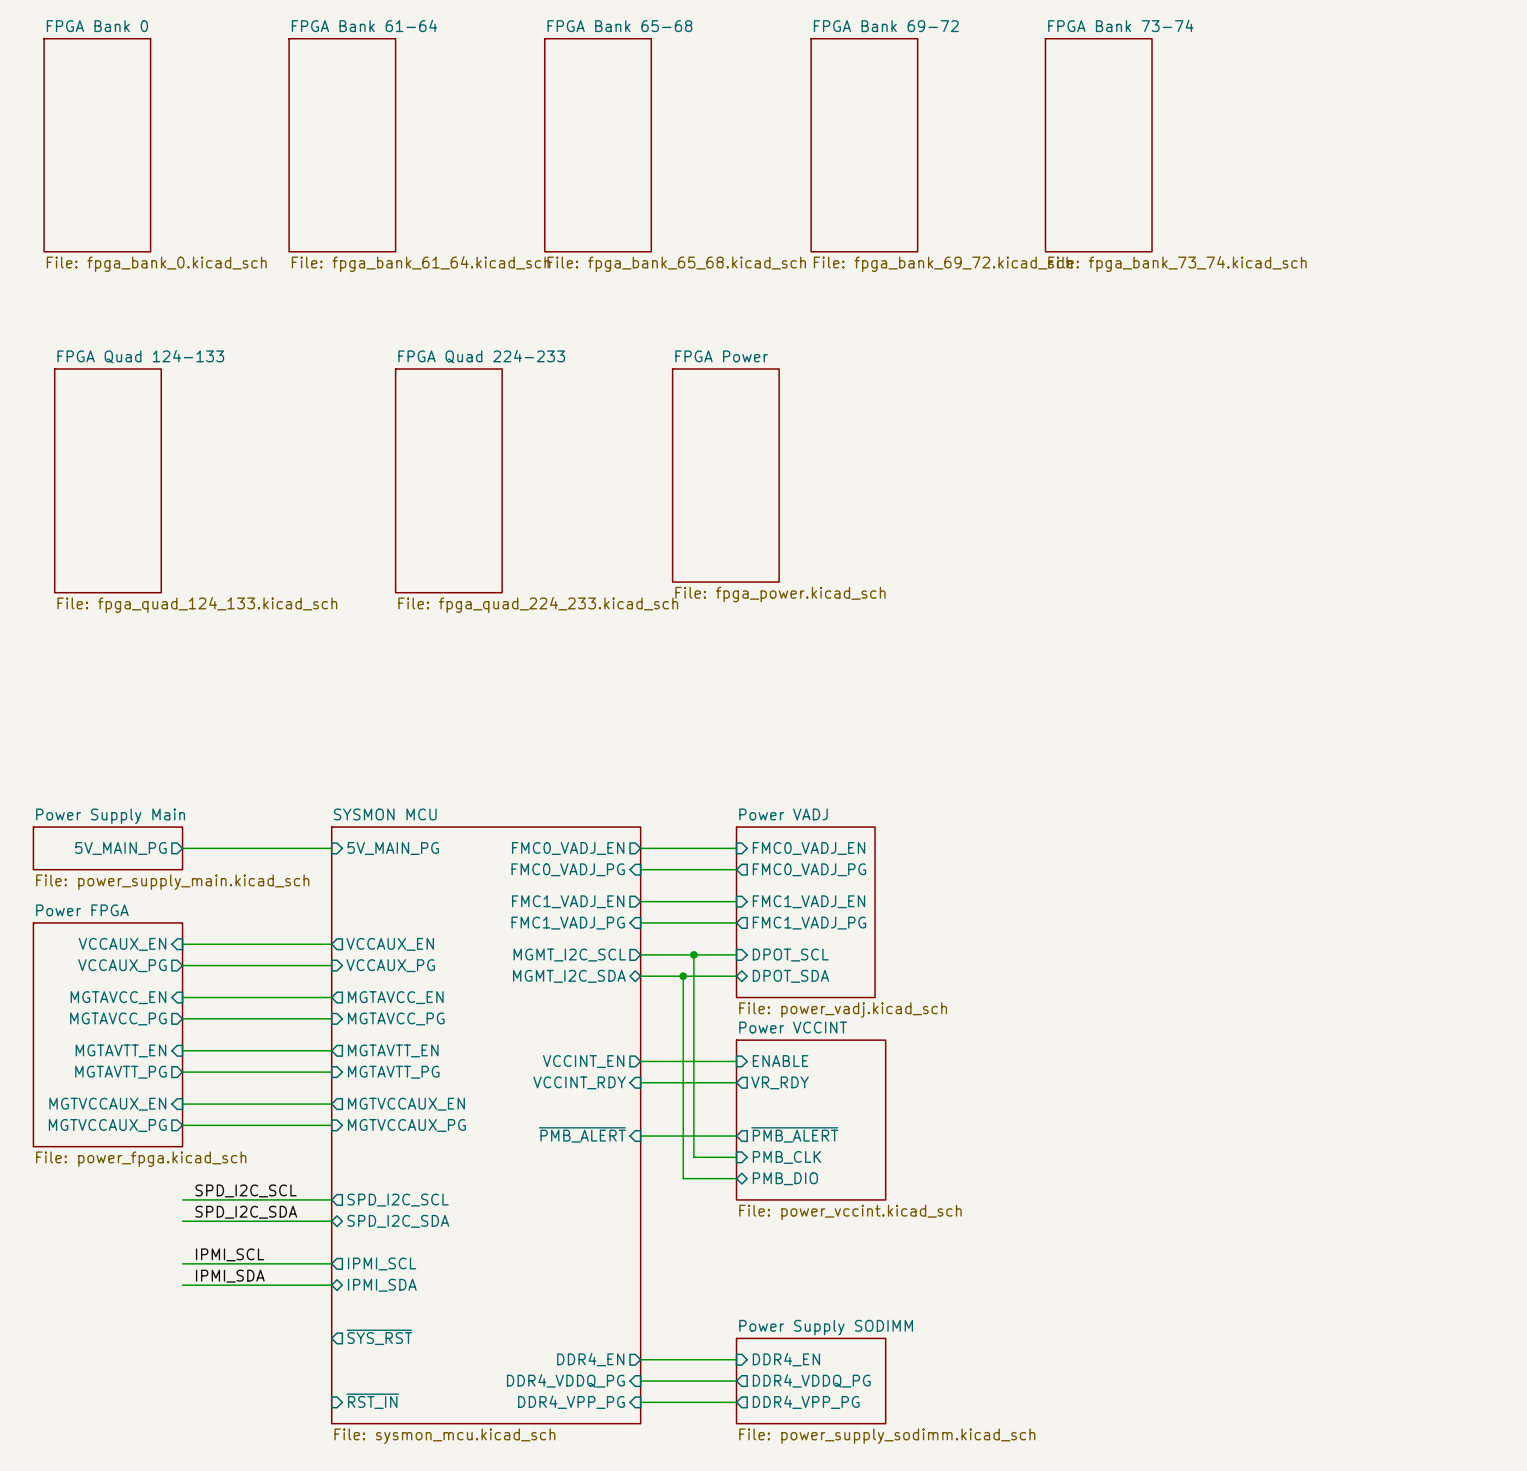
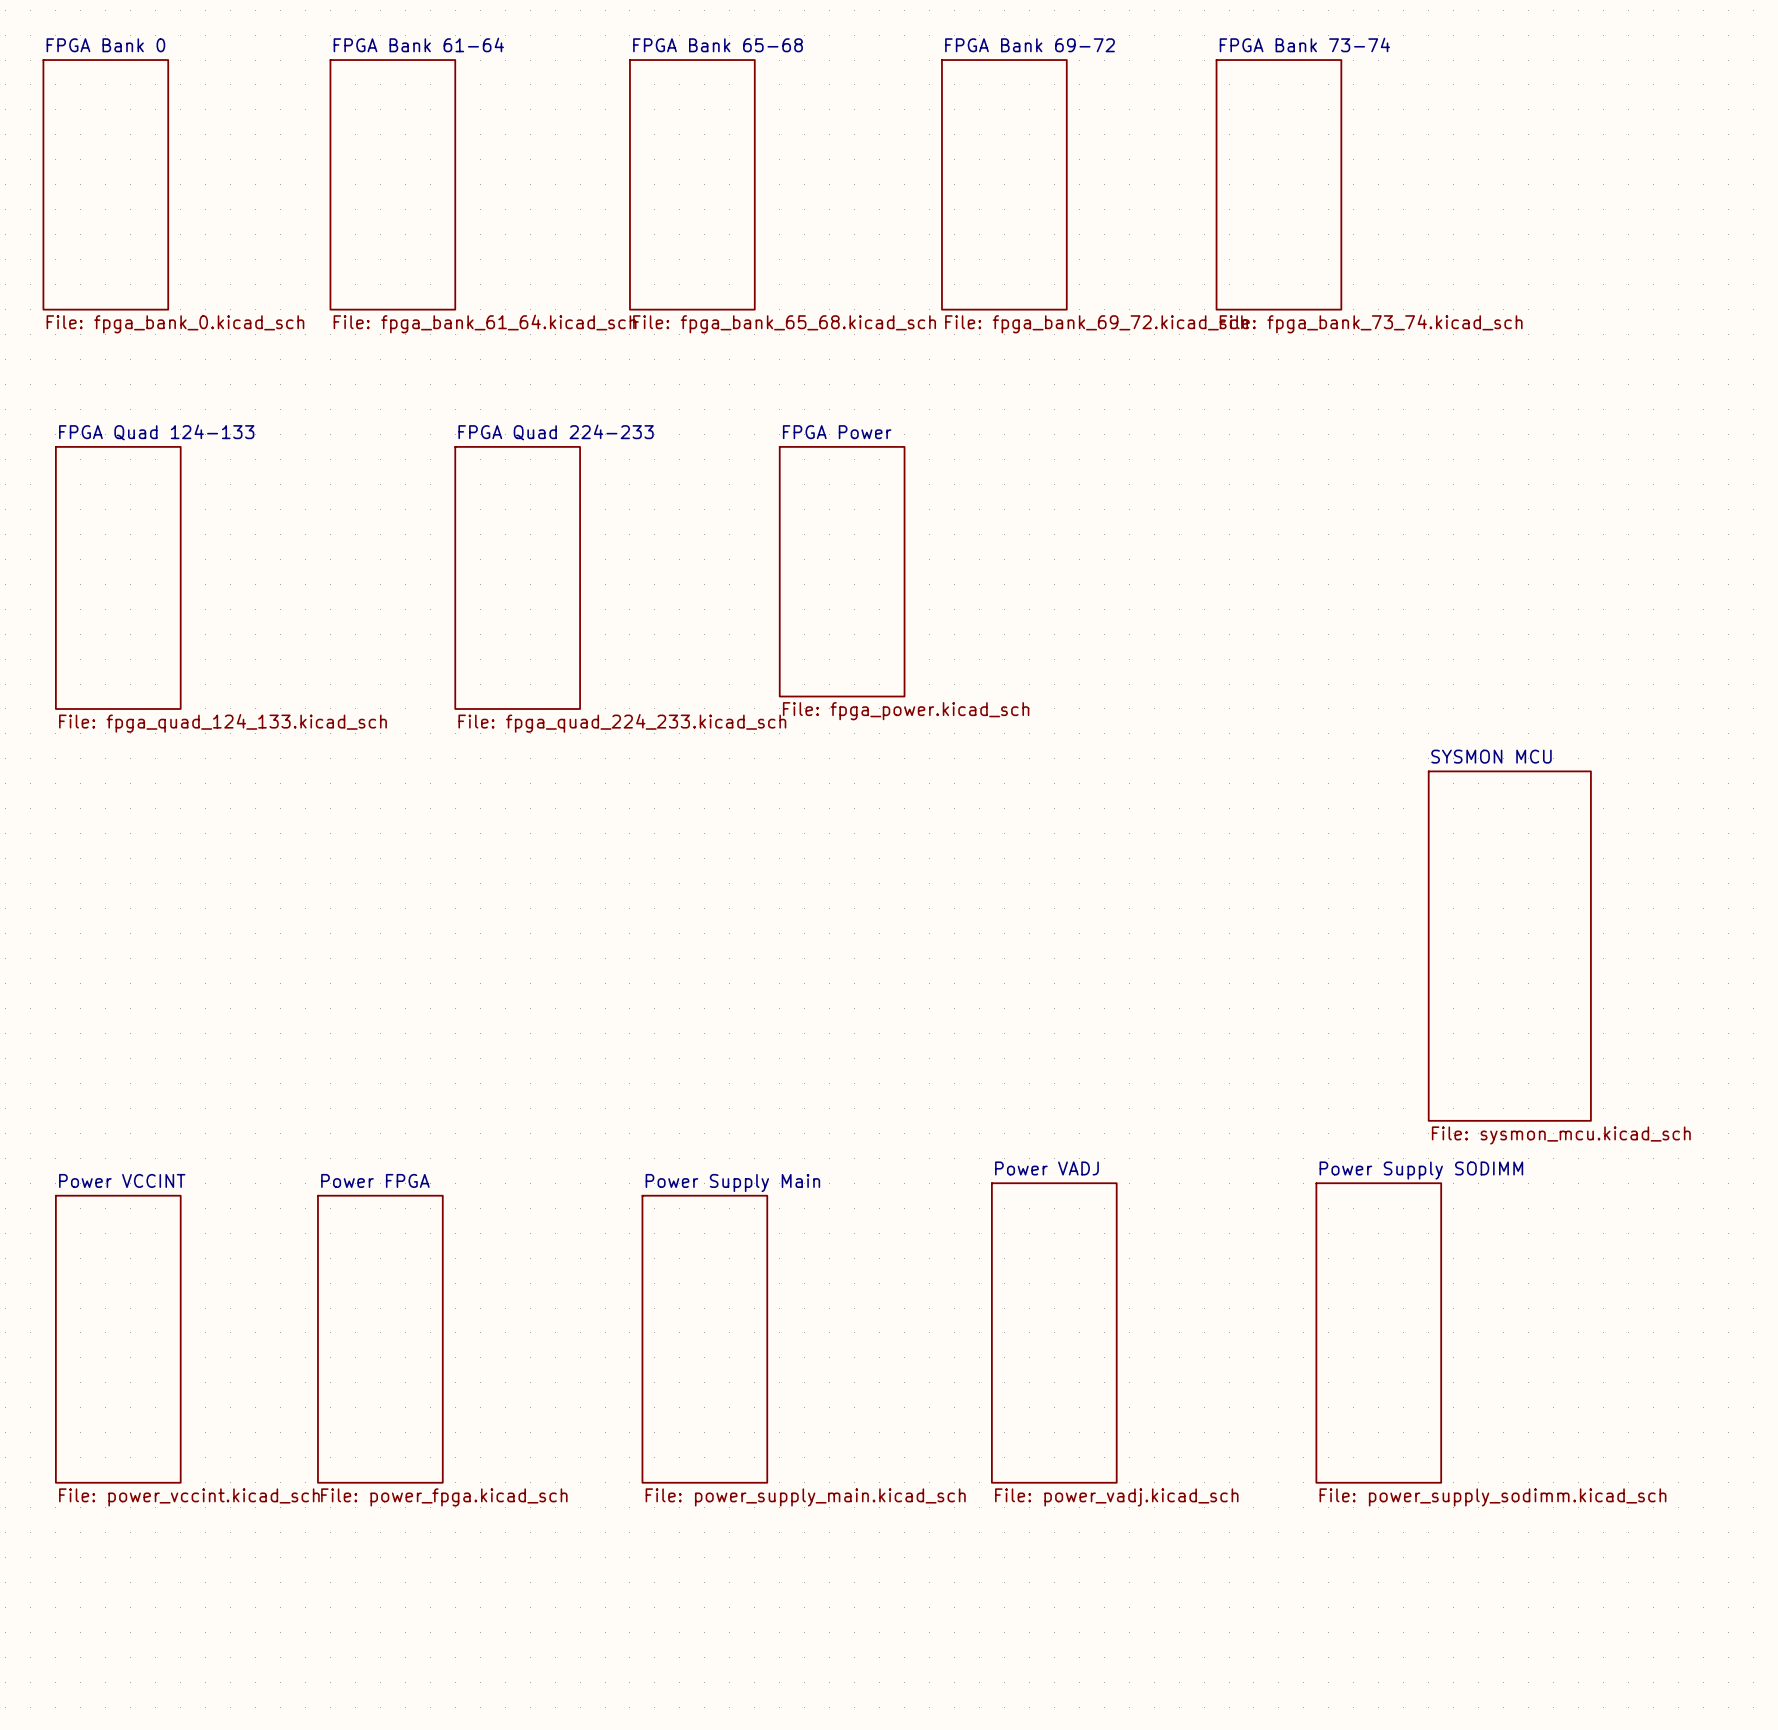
sheet SYSMON MCU: none -> File: sysmon_mcu.kicad_sch (1509, 946)
sheet Power Supply Main: File: power_supply_main.kicad_sch (107, 848) -> none
sheet pin: 5V_MAIN_PG (121, 848) -> none
wire: (182, 848) (331, 848) -> none
sheet pin: 5V_MAIN_PG (393, 848) -> none
sheet pin: FMC0_VADJ_EN (568, 848) -> none
wire: (640, 848) (736, 848) -> none
sheet pin: FMC0_VADJ_EN (808, 848) -> none
sheet pin: FMC0_VADJ_PG (568, 869) -> none
wire: (640, 869) (736, 869) -> none
sheet pin: FMC0_VADJ_PG (809, 869) -> none
sheet pin: FMC1_VADJ_EN (568, 901) -> none
wire: (640, 901) (736, 901) -> none
sheet pin: FMC1_VADJ_EN (808, 901) -> none
sheet Power VADJ: File: power_vadj.kicad_sch (805, 912) -> none
wire: (640, 922) (736, 922) -> none
sheet pin: FMC1_VADJ_PG (568, 923) -> none
sheet pin: FMC1_VADJ_PG (809, 923) -> none
sheet pin: VCCAUX_EN (122, 944) -> none
wire: (182, 944) (331, 944) -> none
sheet pin: VCCAUX_EN (390, 944) -> none
wire: (640, 954) (736, 954) -> none
wire: (693, 954) (693, 1157) (736, 1157) -> none
junction: (693, 954) -> none
sheet pin: MGMT_I2C_SCL (569, 955) -> none
sheet pin: DPOT_SCL (790, 955) -> none
sheet pin: VCCAUX_PG (122, 965) -> none
wire: (182, 965) (331, 965) -> none
sheet pin: VCCAUX_PG (390, 965) -> none
sheet pin: MGMT_I2C_SDA (569, 976) -> none
wire: (640, 976) (736, 976) -> none
wire: (683, 976) (683, 1178) (736, 1178) -> none
junction: (683, 976) -> none
sheet pin: DPOT_SDA (790, 976) -> none
sheet pin: MGTAVCC_EN (118, 997) -> none
wire: (182, 997) (331, 997) -> none
sheet pin: MGTAVCC_EN (395, 997) -> none
sheet pin: MGTAVCC_PG (118, 1018) -> none
wire: (182, 1018) (331, 1018) -> none
sheet pin: MGTAVCC_PG (396, 1018) -> none
sheet Power FPGA: File: power_fpga.kicad_sch (107, 1034) -> none
sheet pin: MGTAVTT_EN (121, 1050) -> none
wire: (182, 1050) (331, 1050) -> none
sheet pin: MGTAVTT_EN (393, 1050) -> none
sheet pin: VCCINT_EN (583, 1061) -> none
wire: (640, 1061) (736, 1061) -> none
sheet pin: ENABLE (780, 1061) -> none
sheet pin: MGTAVTT_PG (121, 1072) -> none
wire: (182, 1072) (331, 1072) -> none
sheet pin: MGTAVTT_PG (393, 1072) -> none
sheet pin: VCCINT_RDY (579, 1082) -> none
wire: (640, 1082) (736, 1082) -> none
sheet pin: VR_RDY (780, 1082) -> none
sheet pin: MGTVCCAUX_EN (107, 1104) -> none
wire: (182, 1104) (331, 1104) -> none
sheet pin: MGTVCCAUX_EN (406, 1104) -> none
sheet Power VCCINT: File: power_vccint.kicad_sch (811, 1120) -> none
sheet pin: MGTVCCAUX_PG (107, 1125) -> none
wire: (182, 1125) (331, 1125) -> none
sheet pin: MGTVCCAUX_PG (406, 1125) -> none
sheet SYSMON MCU: File: sysmon_mcu.kicad_sch (486, 1125) -> none
sheet Power VADJ: none -> File: power_vadj.kicad_sch (1054, 1332)
sheet Power Supply SODIMM: none -> File: power_supply_sodimm.kicad_sch (1378, 1332)
sheet Power VCCINT: none -> File: power_vccint.kicad_sch (118, 1339)
sheet Power FPGA: none -> File: power_fpga.kicad_sch (380, 1339)
sheet Power Supply Main: none -> File: power_supply_main.kicad_sch (704, 1339)
sheet pin: ~{PMB_ALERT} (582, 1134) -> none
sheet pin: ~{PMB_ALERT} (794, 1134) -> none
wire: (640, 1136) (736, 1136) -> none
sheet pin: PMB_CLK (786, 1157) -> none
sheet pin: PMB_DIO (785, 1178) -> none
label: SPD_I2C_SCL (246, 1190) -> none
wire: (182, 1199) (331, 1199) -> none
sheet pin: SPD_I2C_SCL (398, 1200) -> none
label: SPD_I2C_SDA (246, 1212) -> none
wire: (182, 1221) (331, 1221) -> none
sheet pin: SPD_I2C_SDA (398, 1221) -> none
label: IPMI_SCL (230, 1254) -> none
wire: (182, 1263) (331, 1263) -> none
sheet pin: IPMI_SCL (382, 1263) -> none
label: IPMI_SDA (230, 1276) -> none
wire: (182, 1285) (331, 1285) -> none
sheet pin: IPMI_SDA (382, 1285) -> none
sheet pin: ~{SYS_RST} (379, 1337) -> none
sheet pin: DDR4_EN (590, 1359) -> none
wire: (640, 1359) (736, 1359) -> none
sheet pin: DDR4_EN (786, 1359) -> none
sheet pin: DDR4_VDDQ_PG (565, 1380) -> none
sheet pin: DDR4_VDDQ_PG (811, 1380) -> none
wire: (640, 1381) (736, 1381) -> none
sheet Power Supply SODIMM: File: power_supply_sodimm.kicad_sch (811, 1381) -> none
sheet pin: ~{RST_IN} (372, 1401) -> none
sheet pin: DDR4_VPP_PG (571, 1402) -> none
wire: (640, 1402) (736, 1402) -> none
sheet pin: DDR4_VPP_PG (806, 1402) -> none

